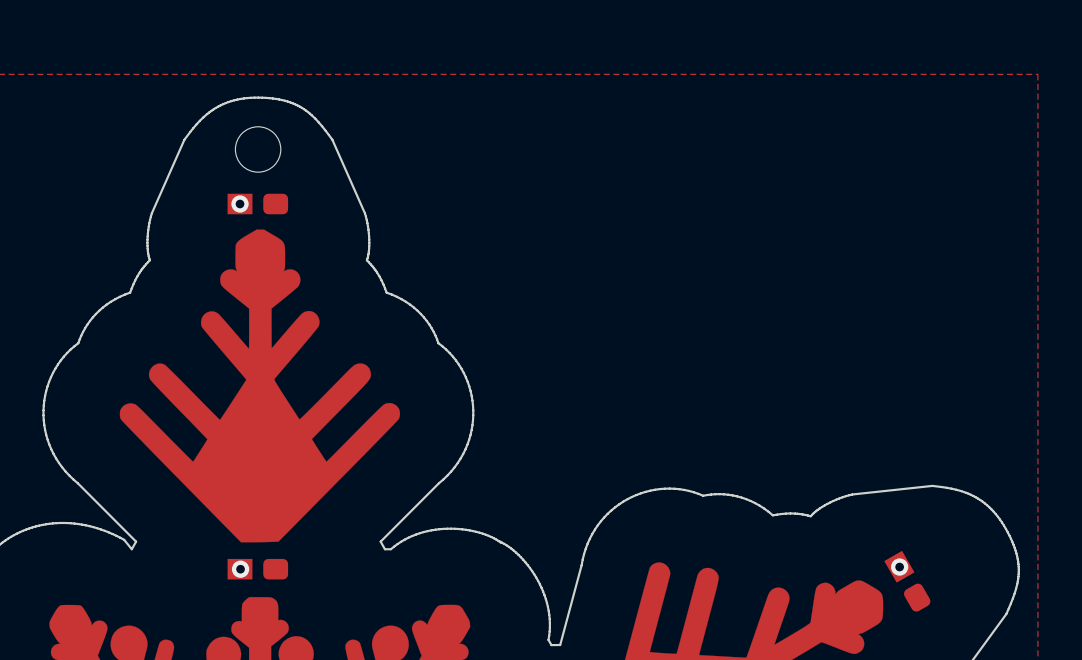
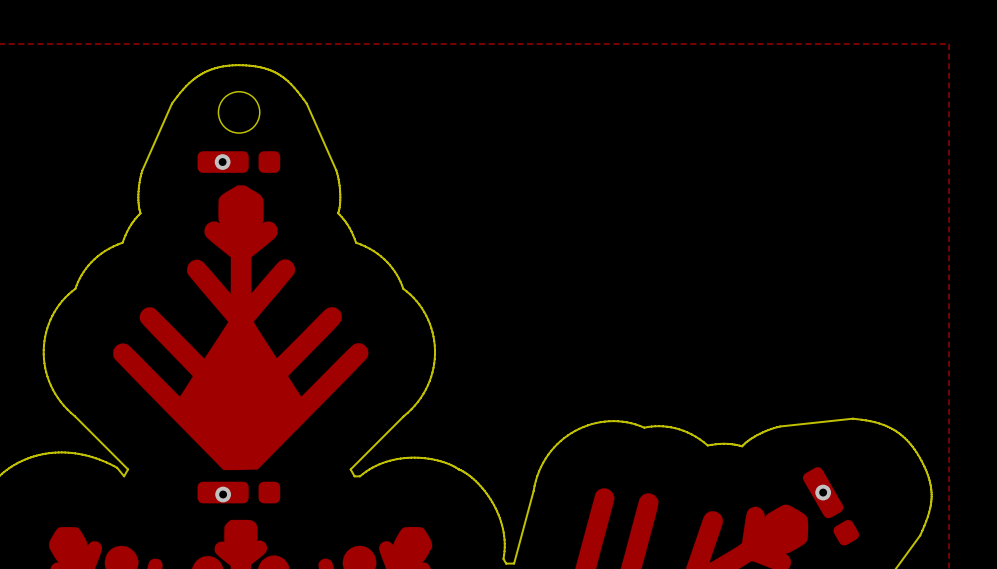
part footprint: [227, 193, 289, 215] -> [197, 151, 281, 173]
part footprint: [884, 550, 931, 612] -> [802, 467, 860, 546]
part footprint: [227, 558, 289, 580] -> [197, 481, 281, 504]

